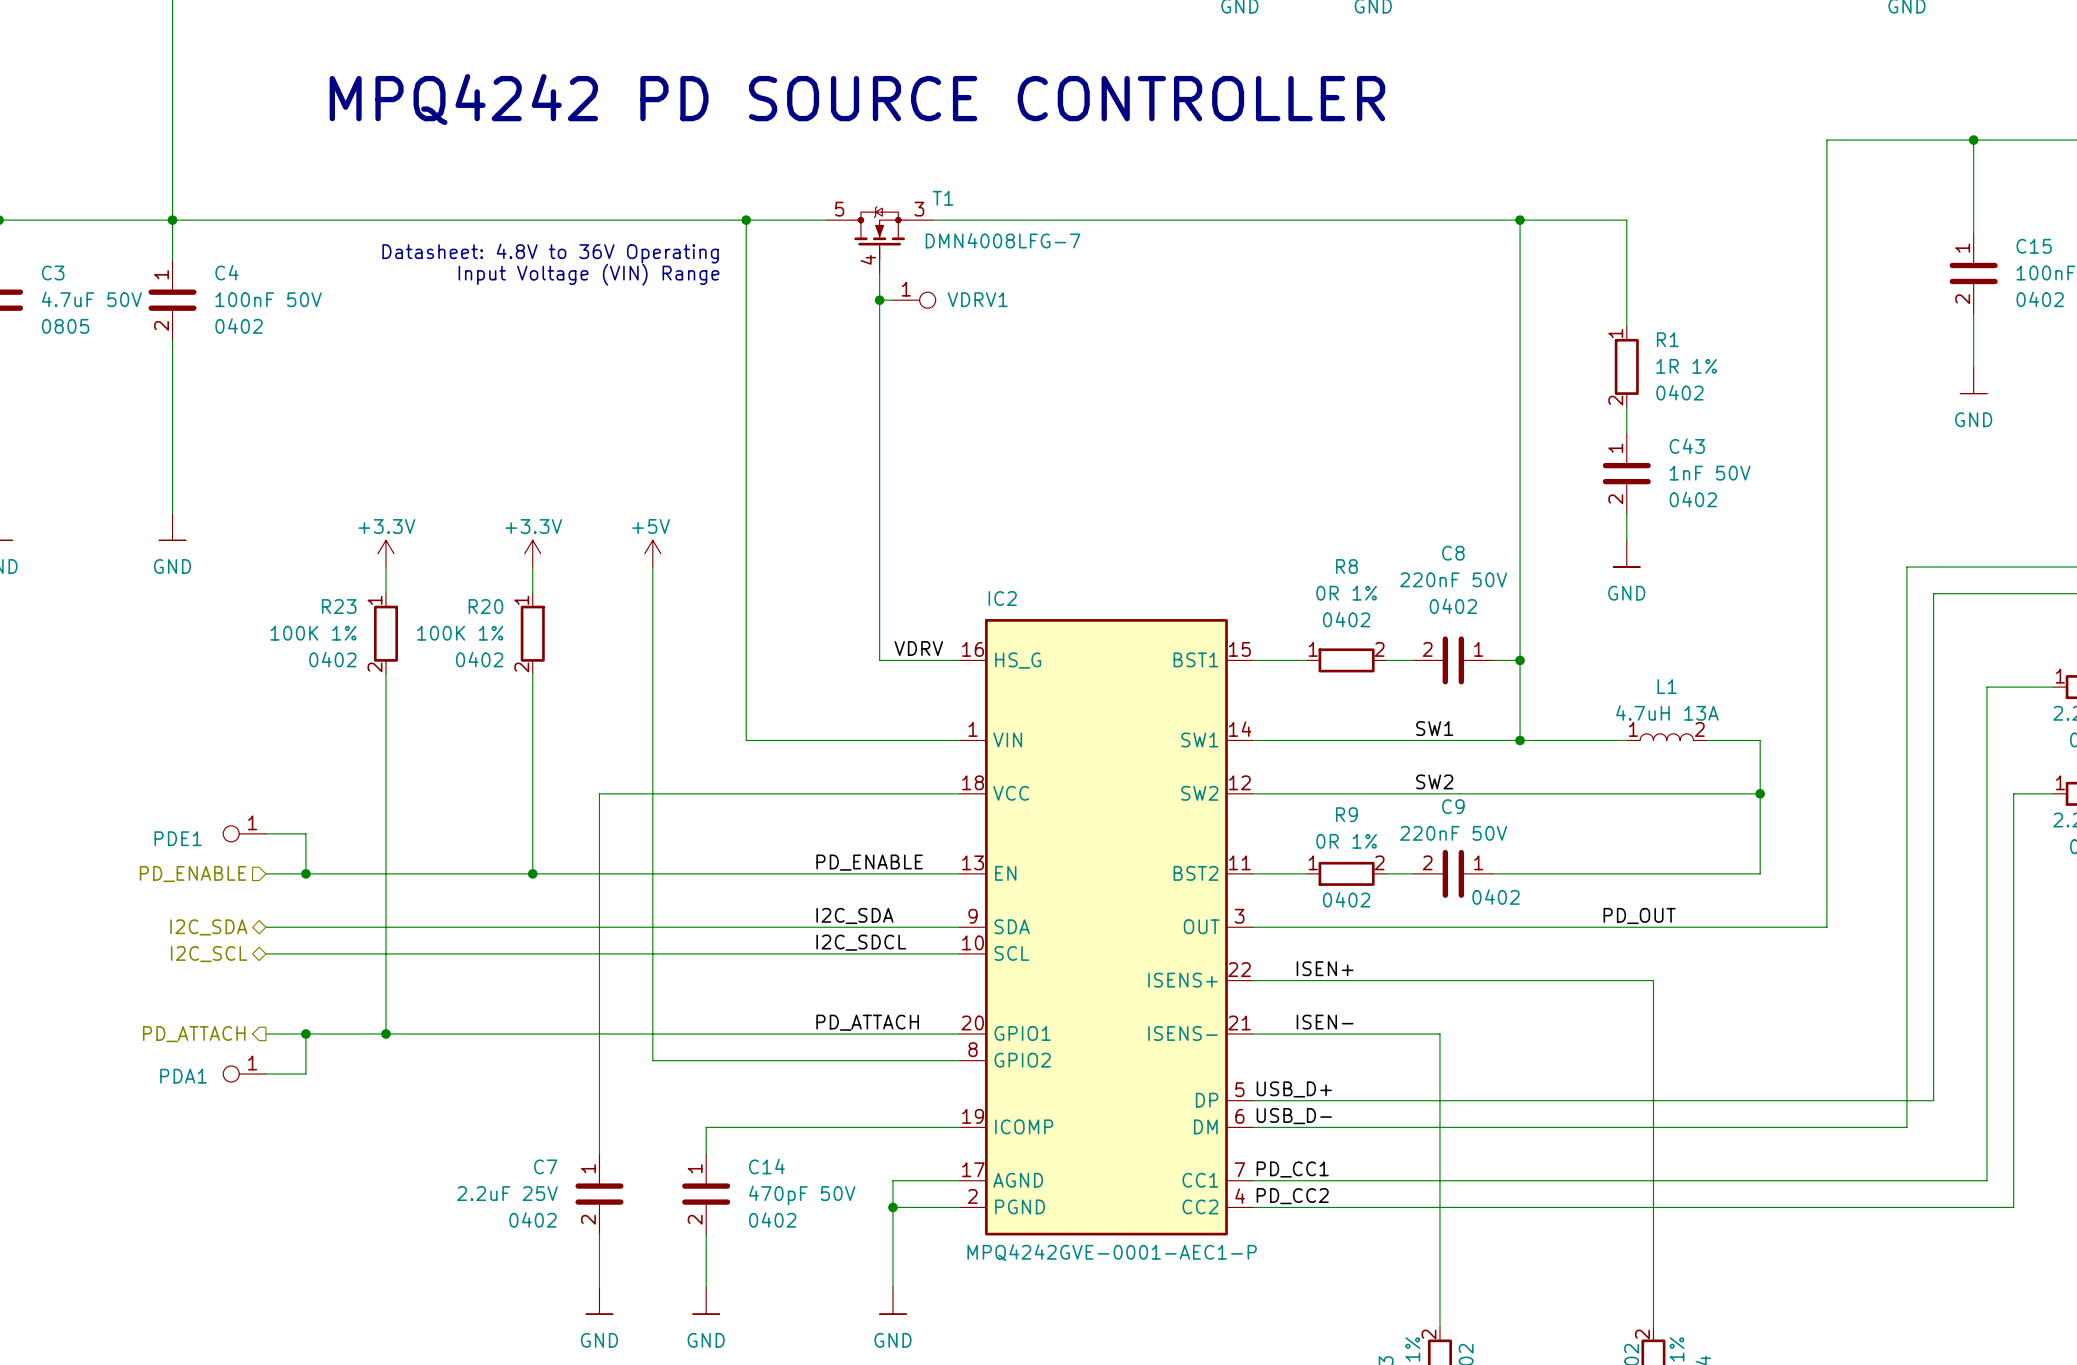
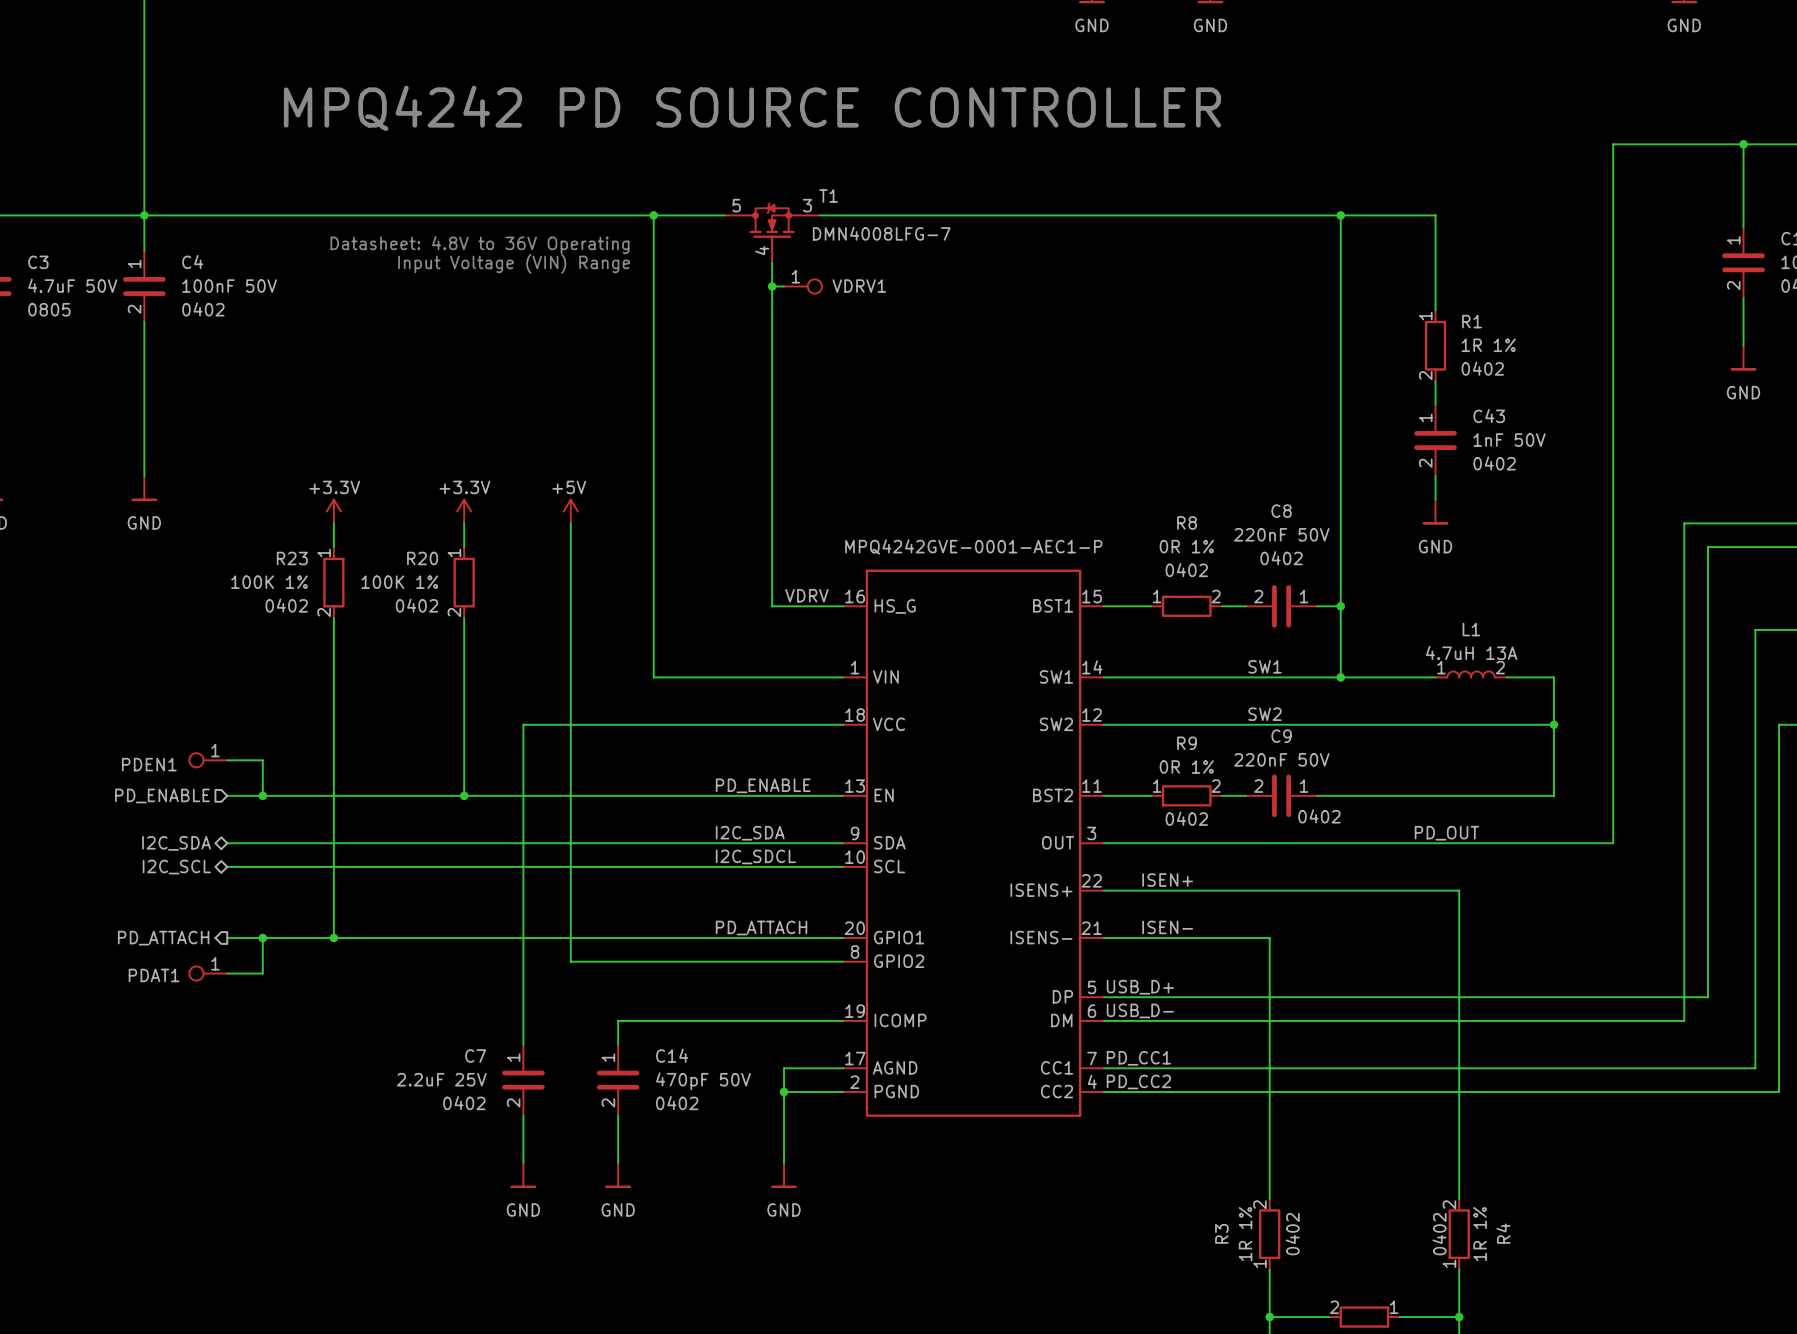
IC2 name: IC2 (1002, 598) -> none
PDE1 name: PDE1 (178, 838) -> PDEN1 (149, 764)
PDA1 name: PDA1 (183, 1076) -> PDAT1 (154, 975)
IC2 value position: MPQ4242GVE-0001-AEC1-P (1112, 1252) -> MPQ4242GVE-0001-AEC1-P (973, 546)

